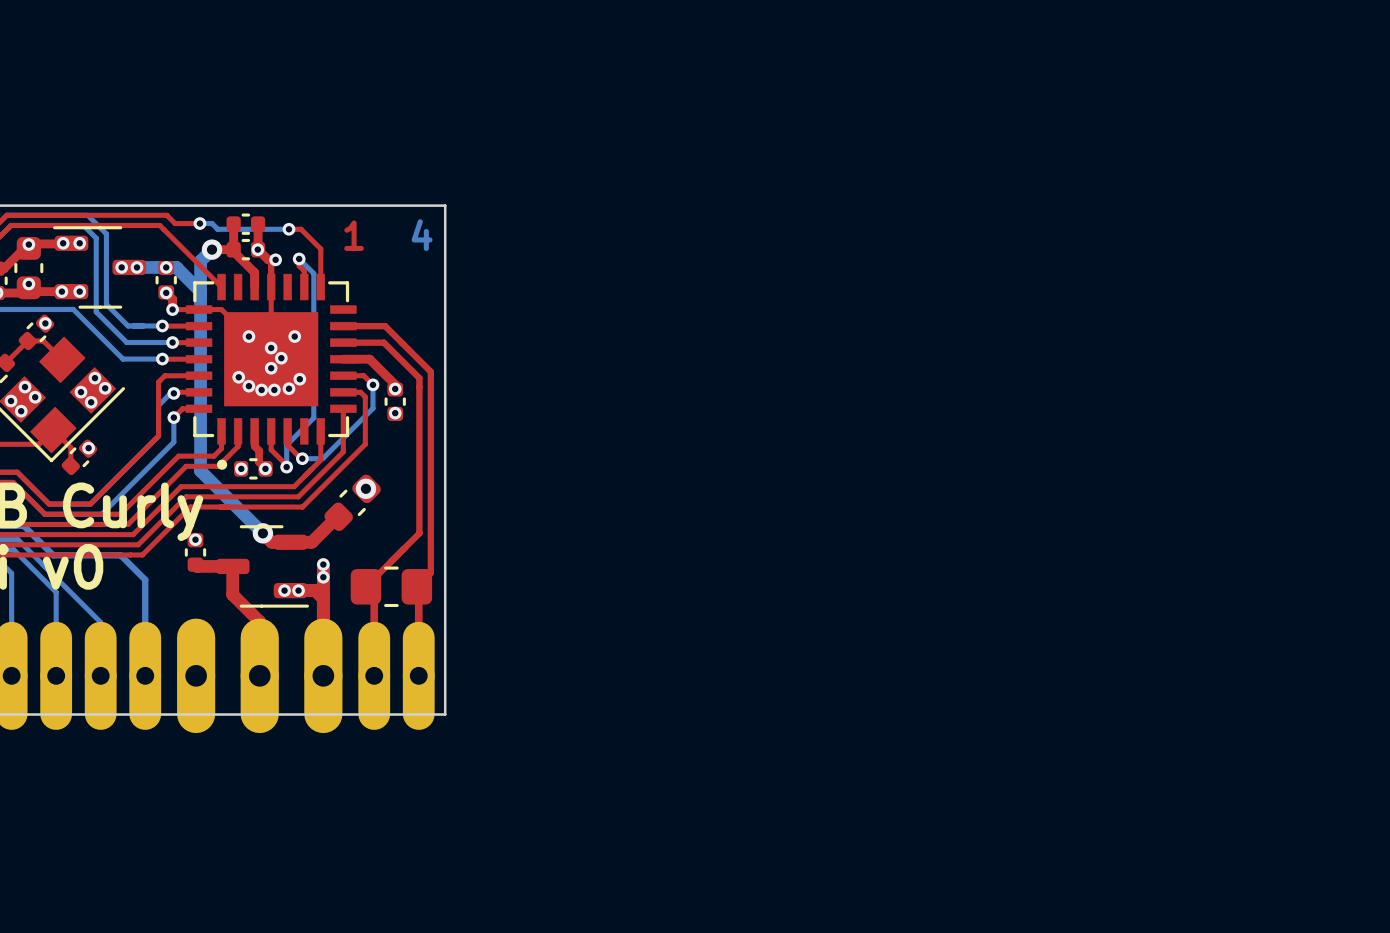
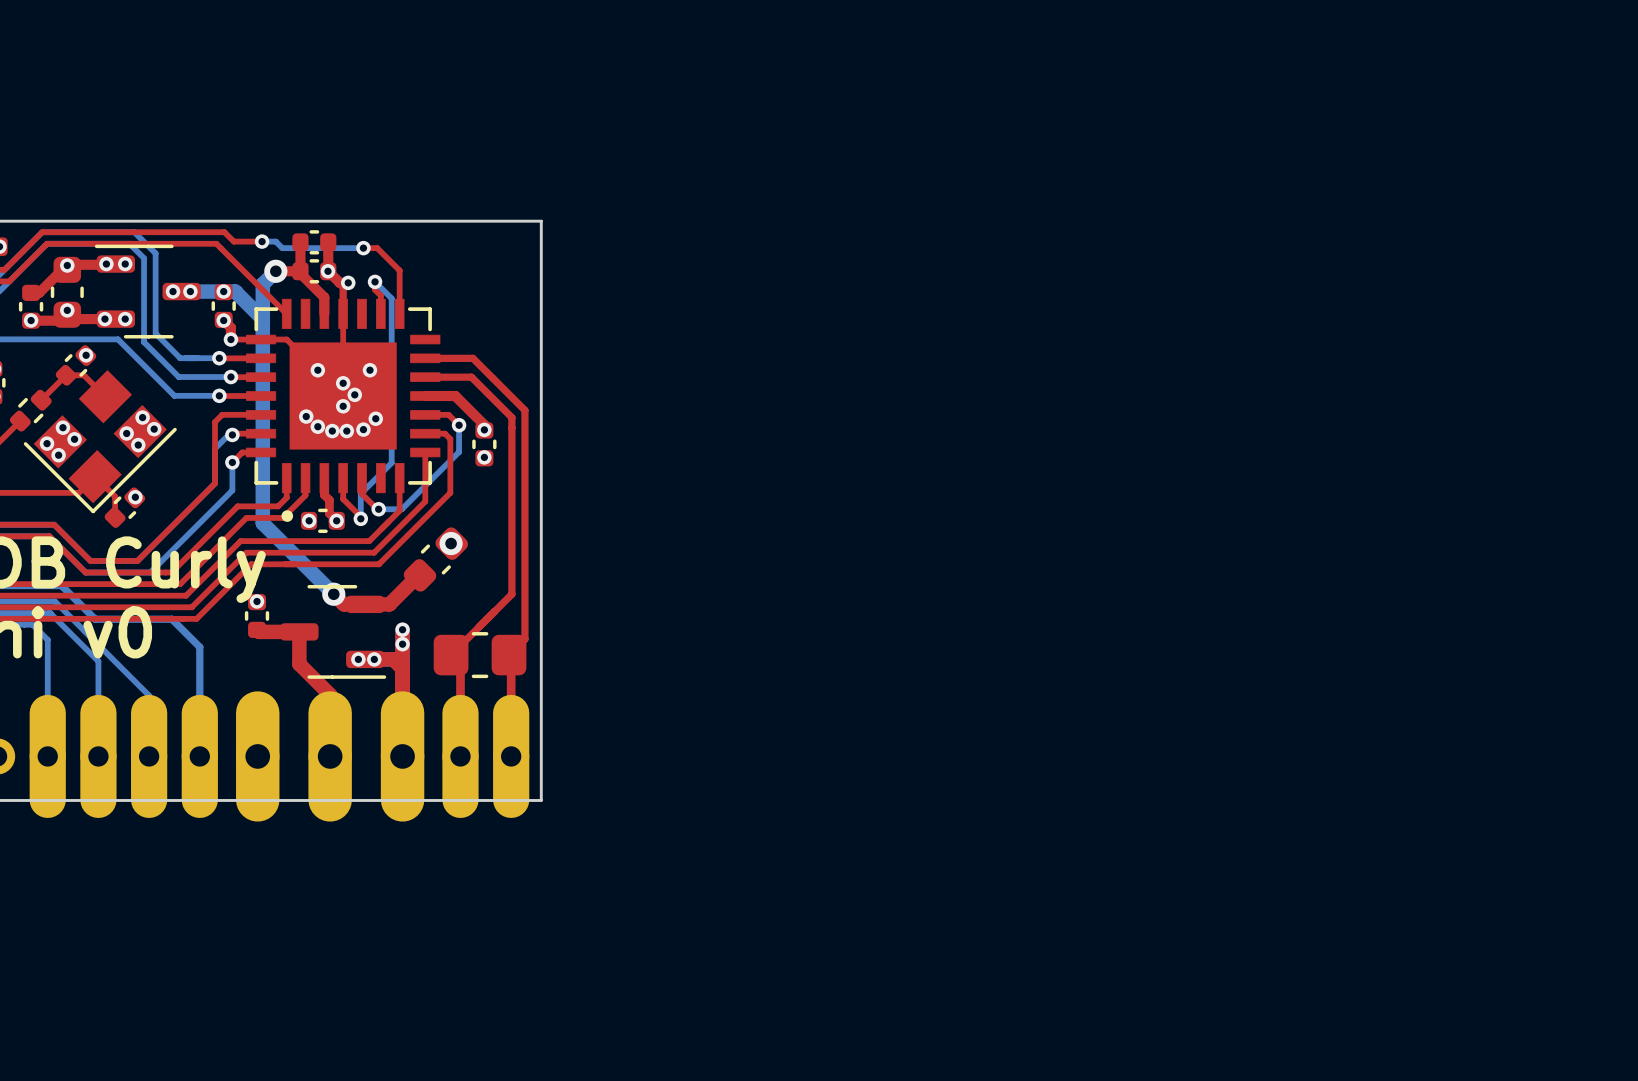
text: 1 (354, 235) -> none
text: 4 (422, 235) -> none

